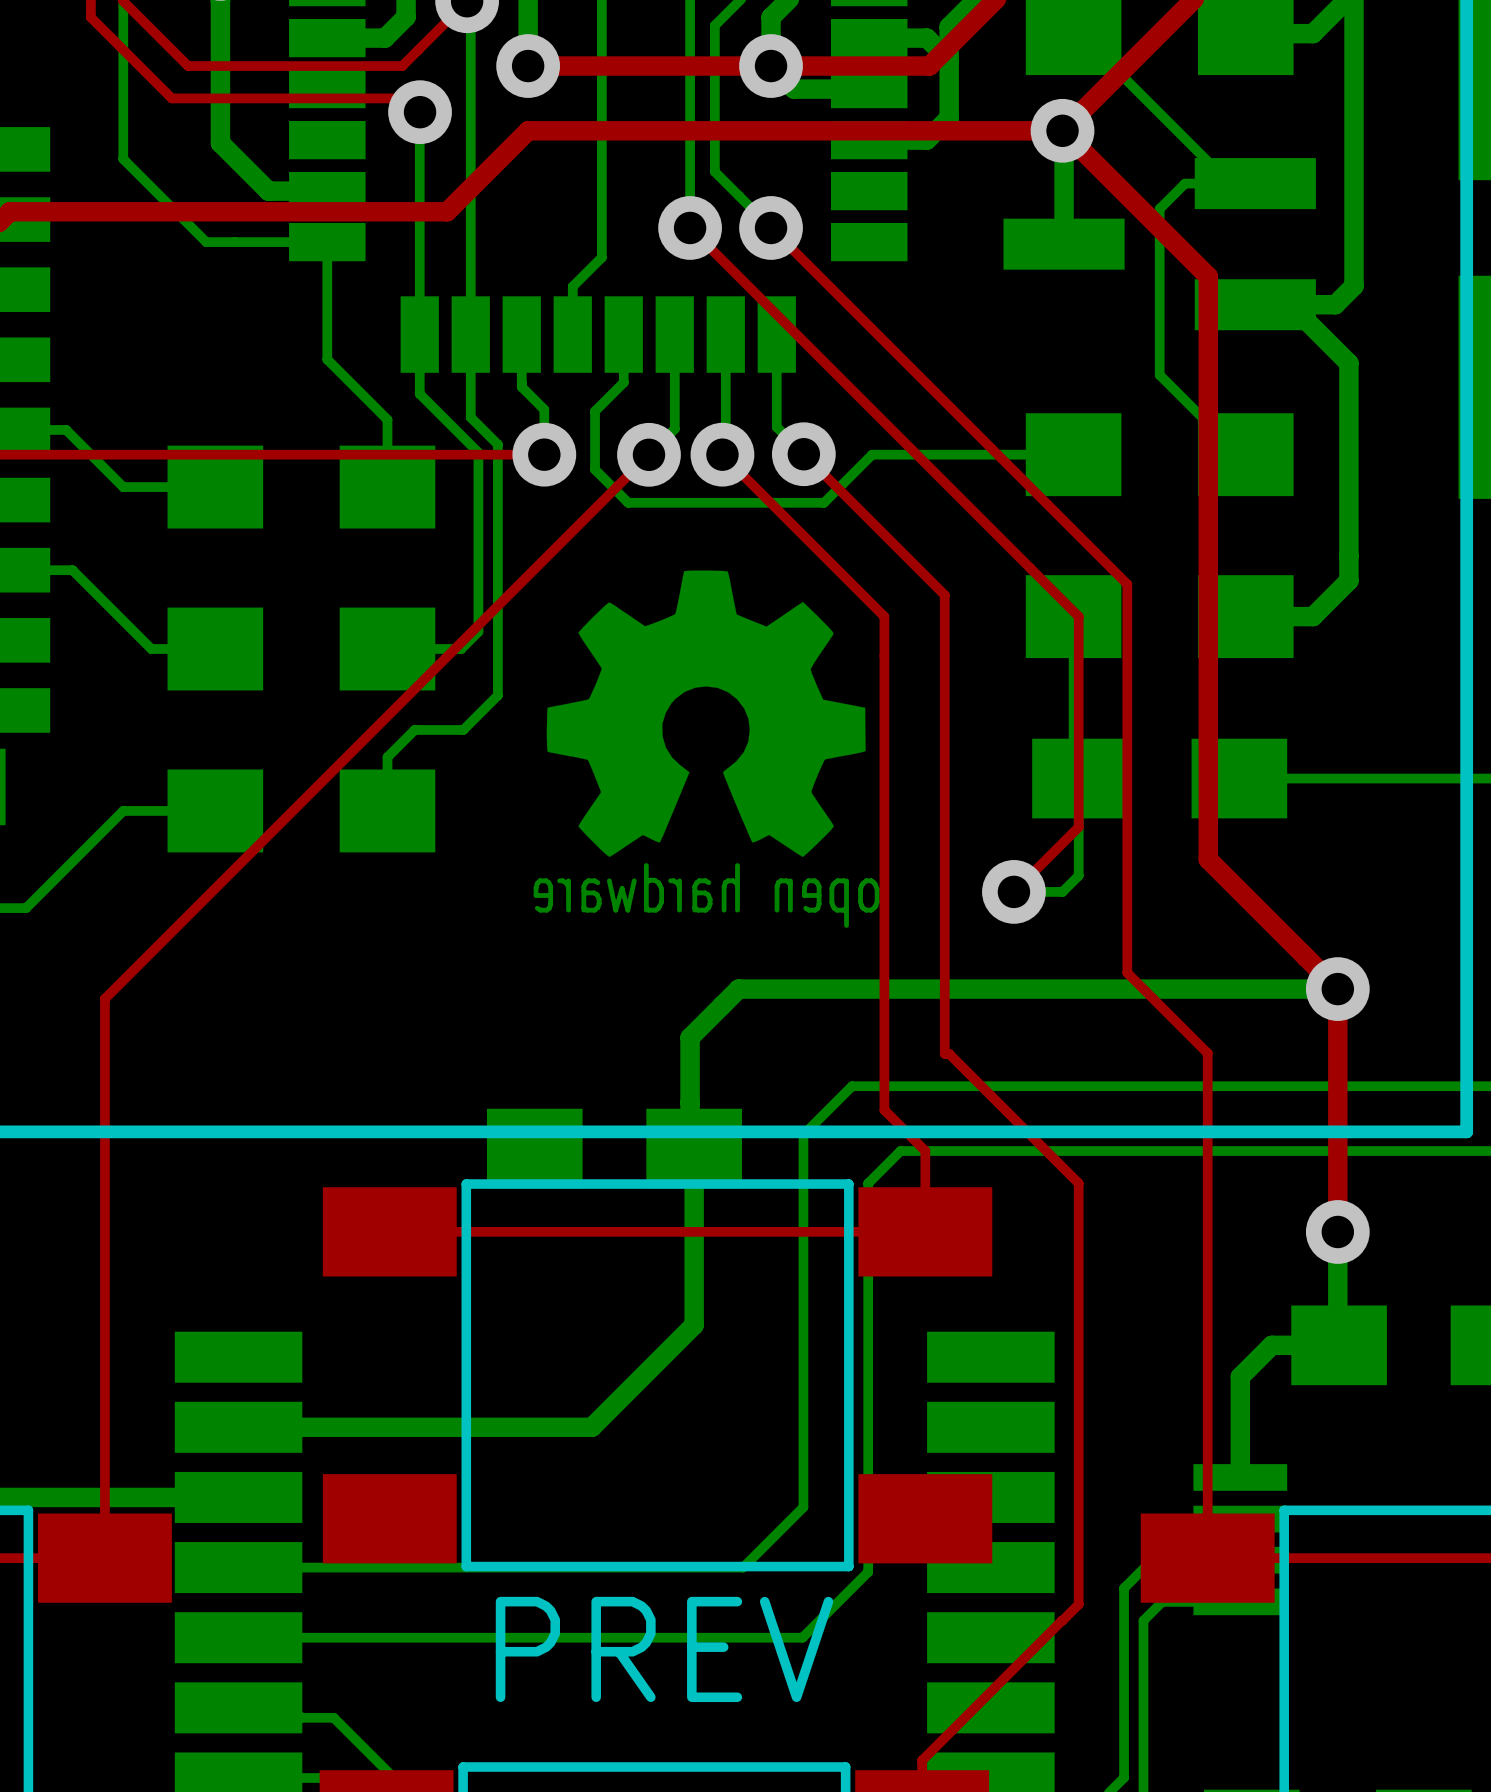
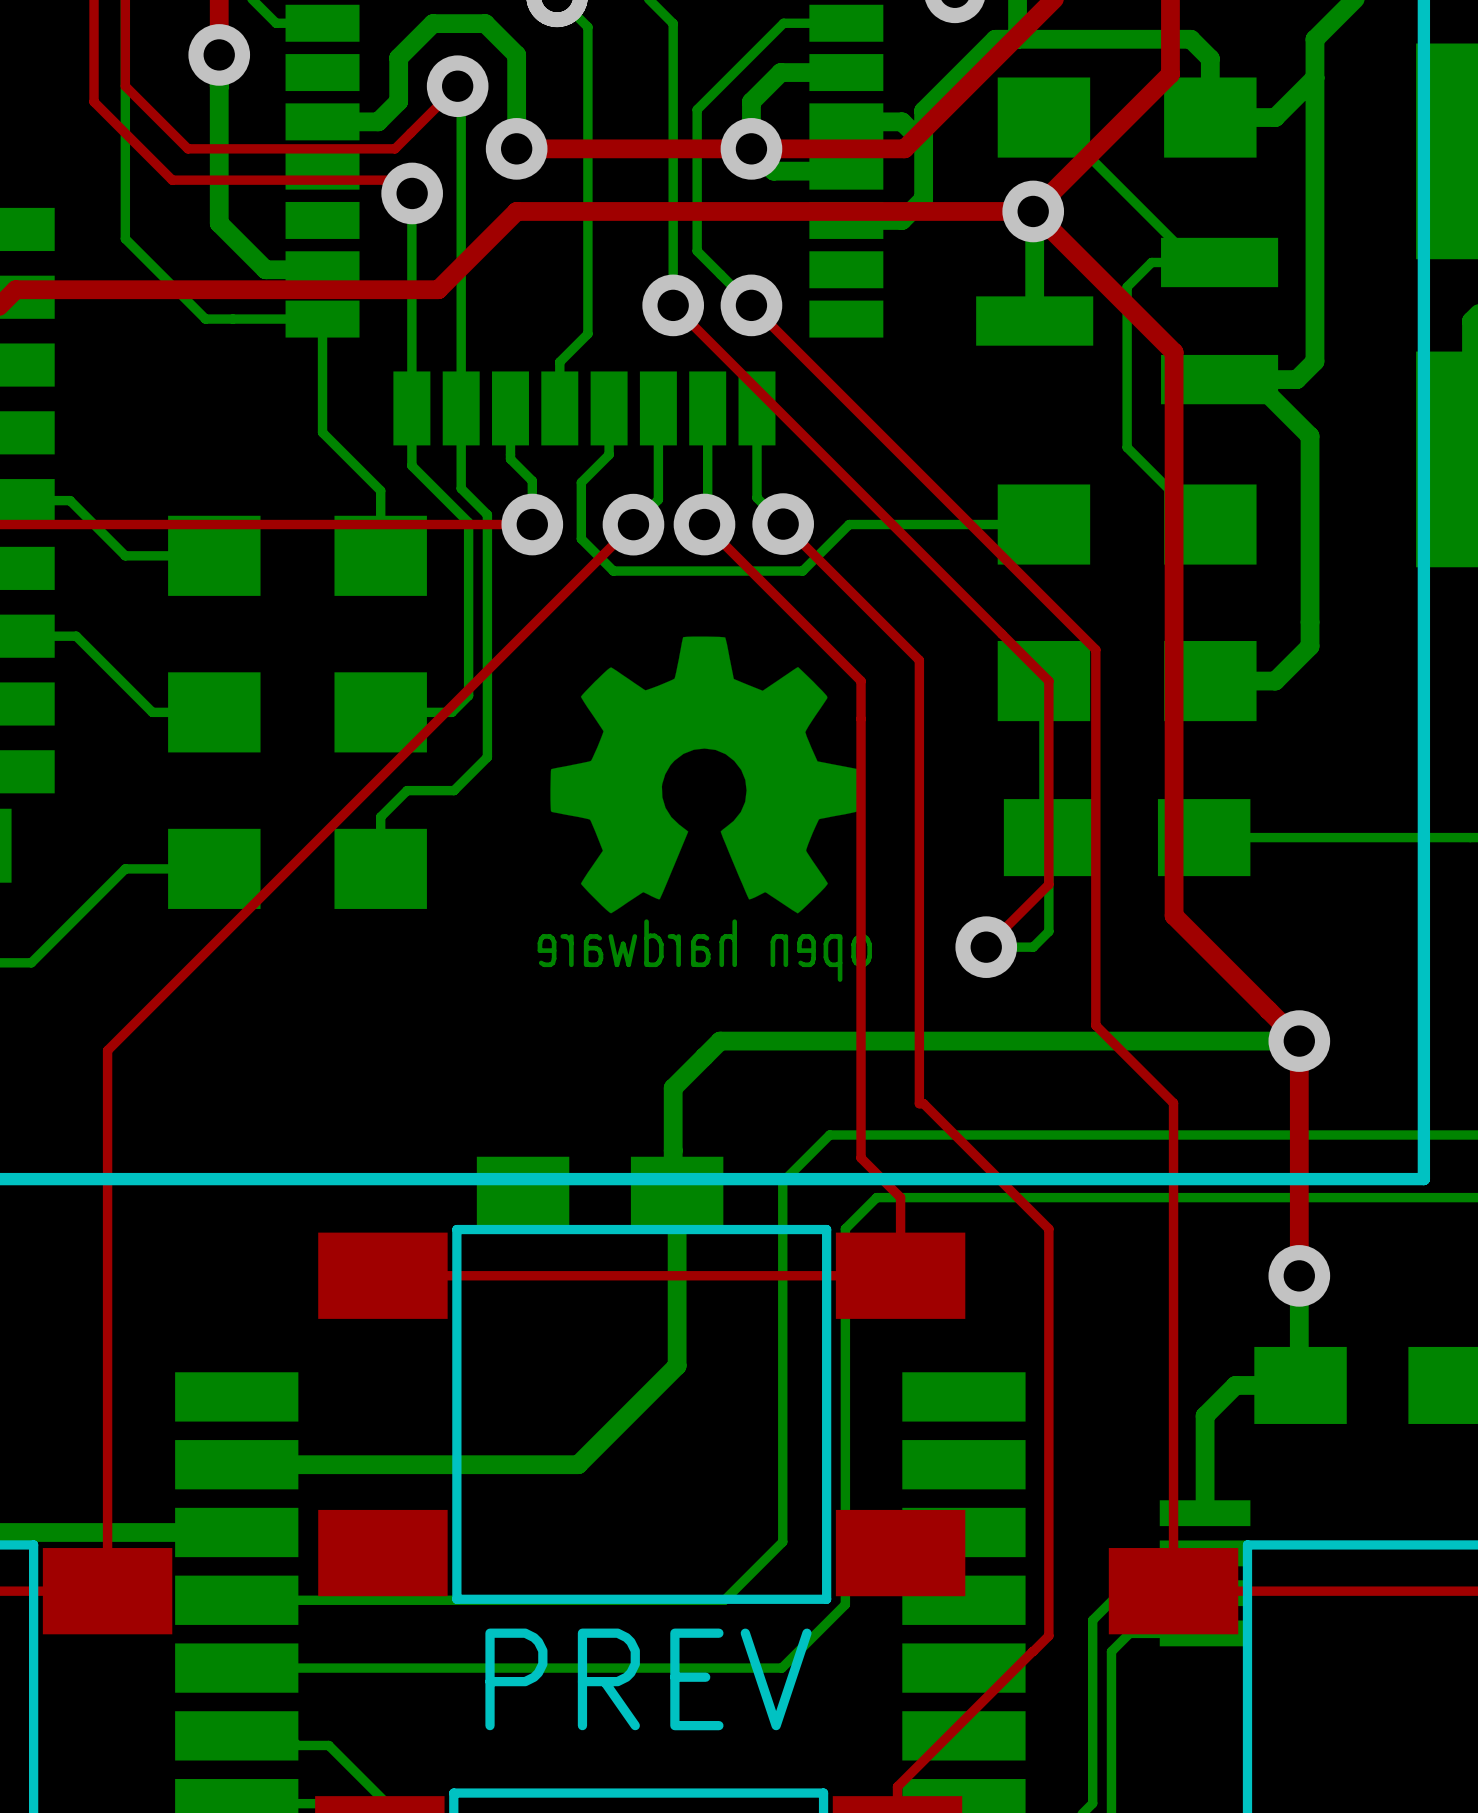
drawing position: (706, 749) -> (704, 809)

